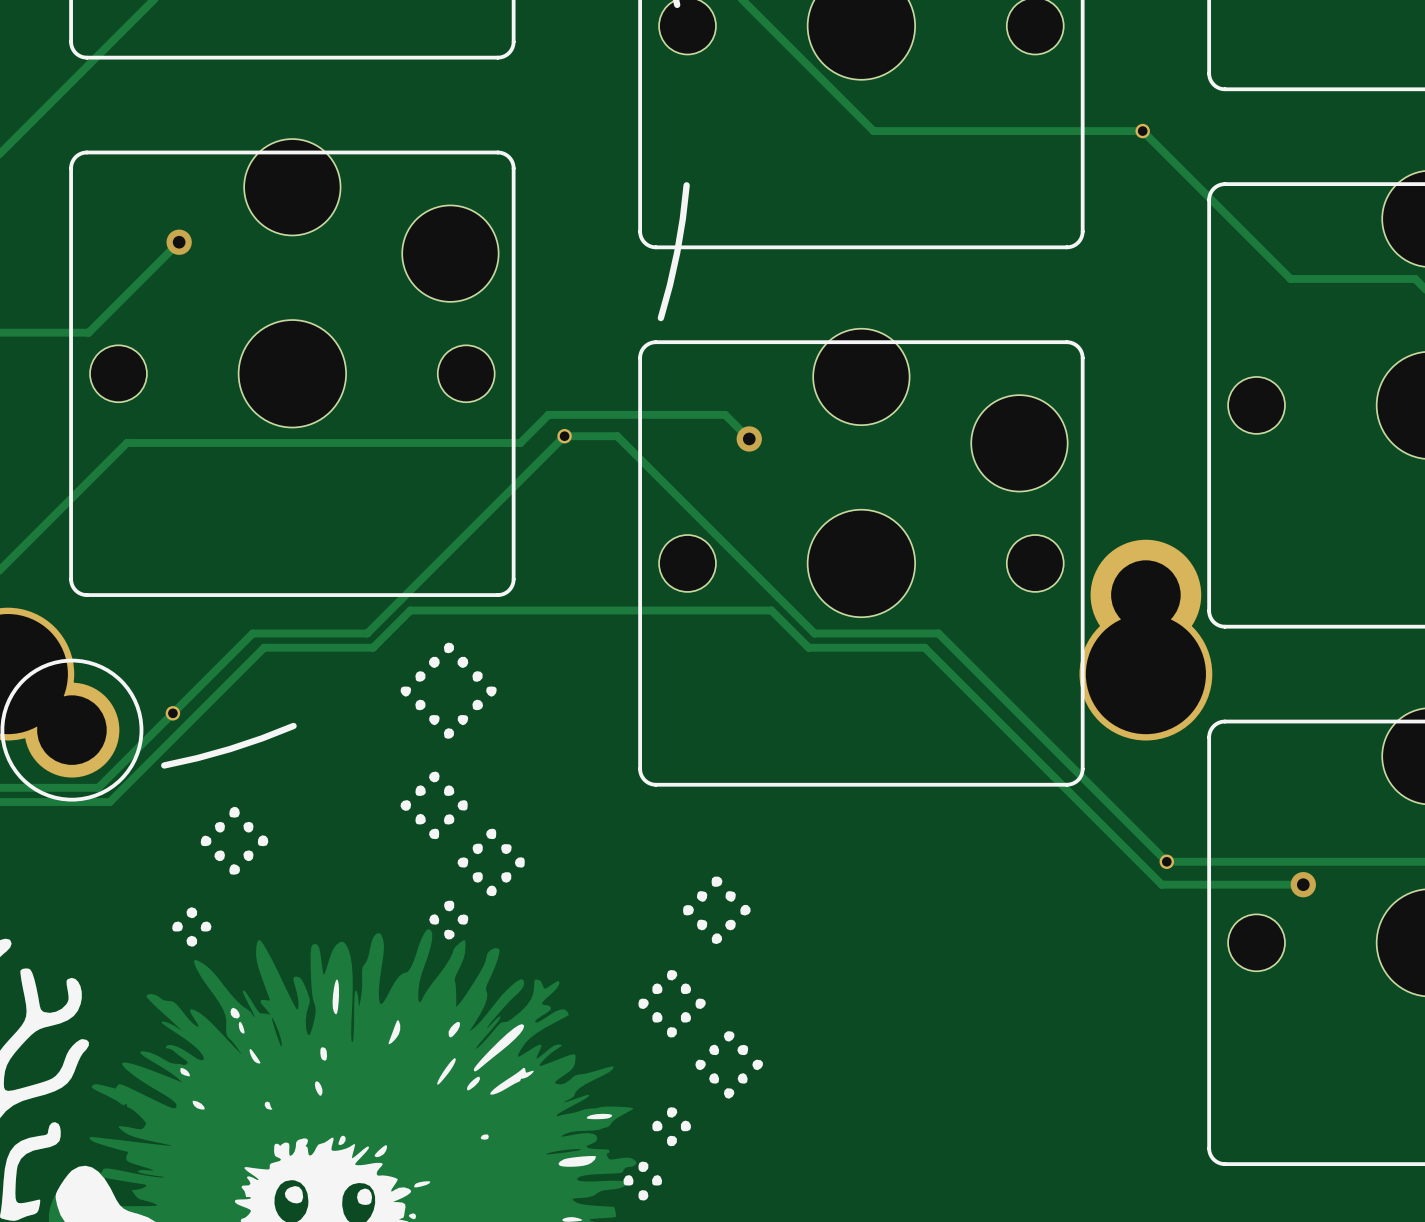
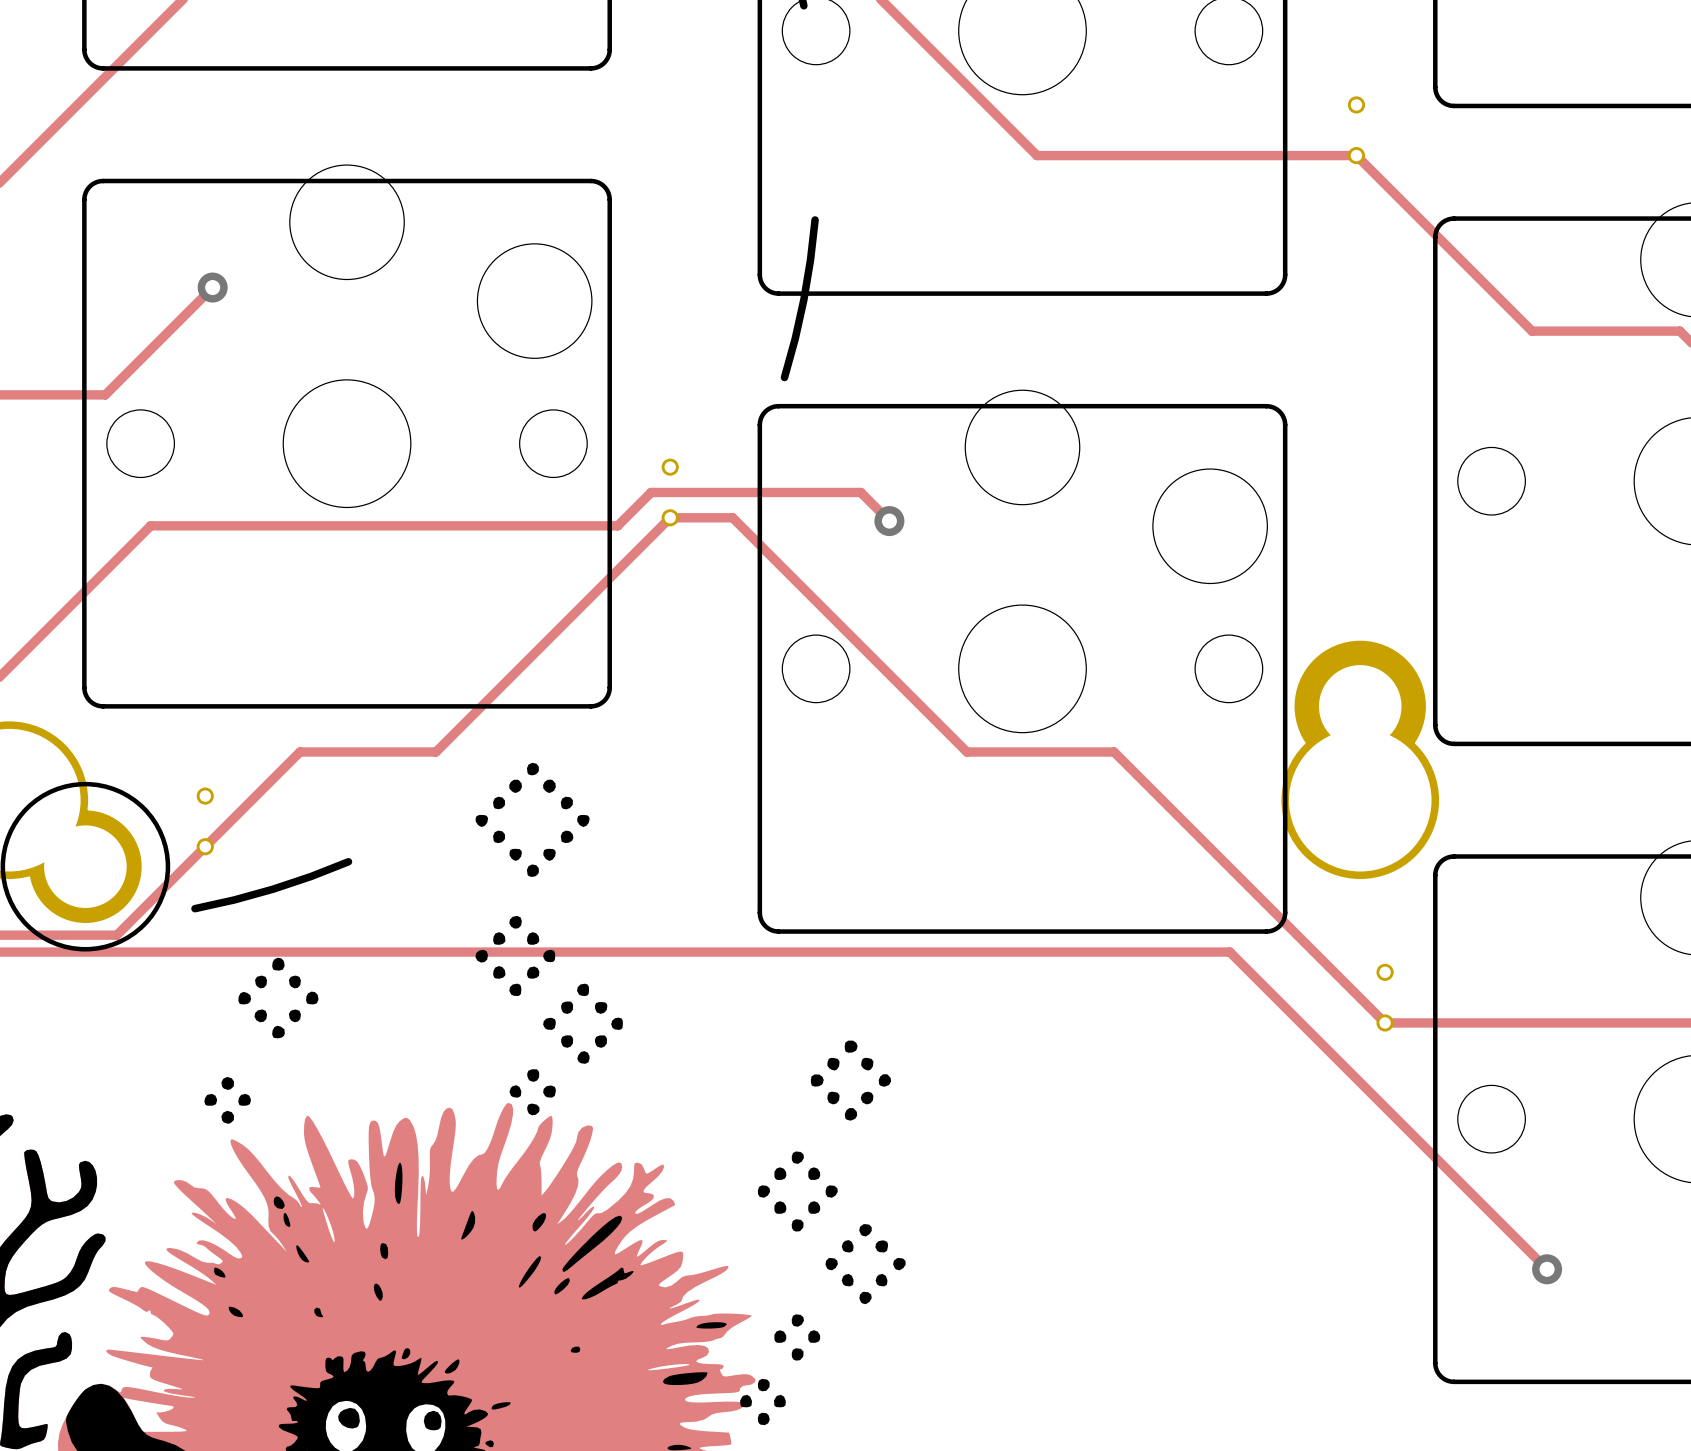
part footprint: [1135, 123, 1150, 139] -> [1347, 96, 1366, 165]
part footprint: [557, 428, 572, 444] -> [661, 458, 679, 527]
part footprint: [165, 706, 181, 721] -> [196, 787, 214, 856]
track: (109, 802) (264, 647) (373, 647) (410, 610) (771, 610) (808, 647) (924, 647) (1161, 884) (1303, 884) -> (130, 952) (1229, 952) (1547, 1269)
part footprint: [1159, 854, 1175, 869] -> [1376, 963, 1394, 1032]
via position: (1303, 884) -> (1547, 1269)

